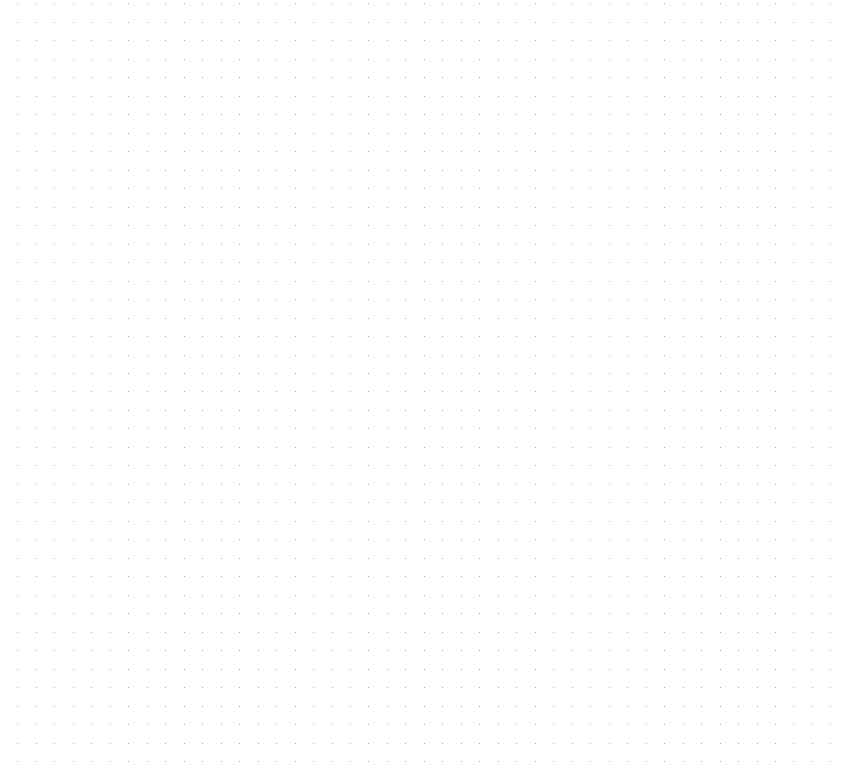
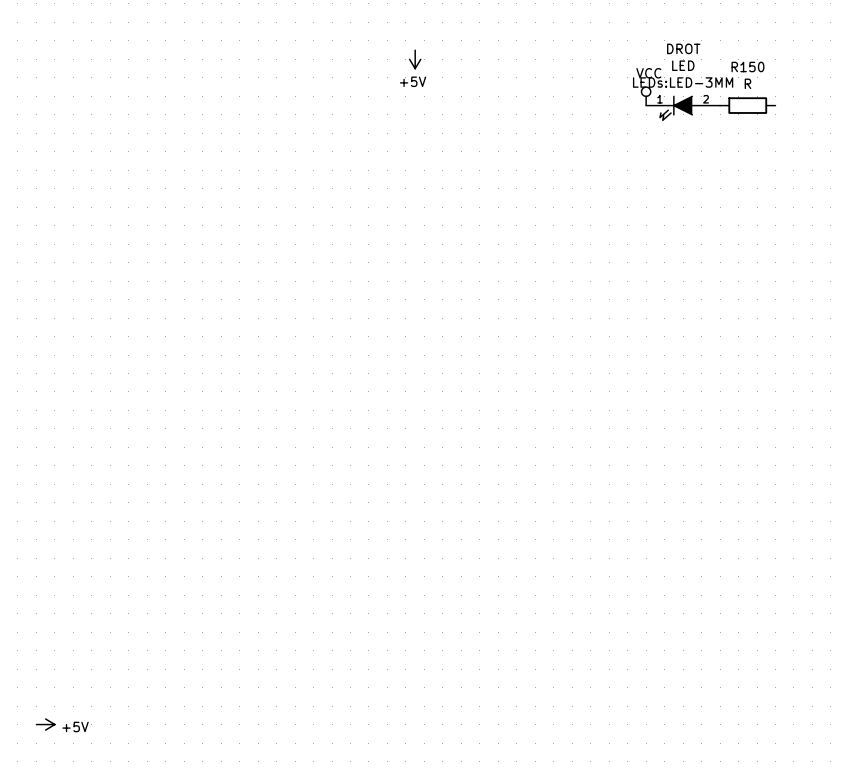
power symbol: none -> +5V (415, 59)
power symbol: none -> VCC (646, 96)
R150: none -> R (747, 105)
DROT: none -> LED (683, 108)
power symbol: none -> +5V (45, 724)

